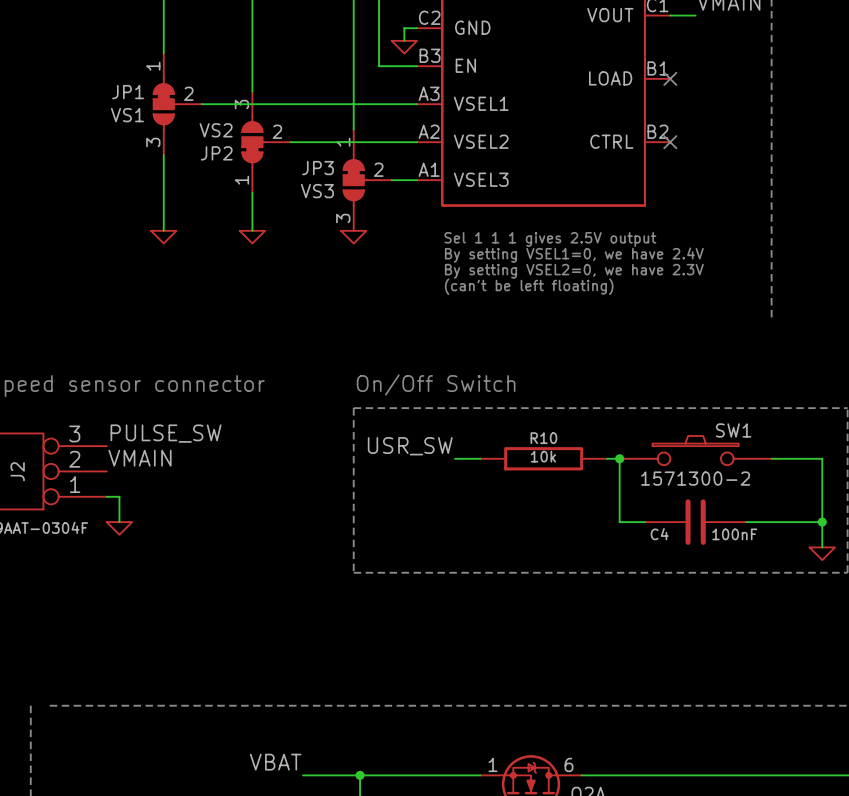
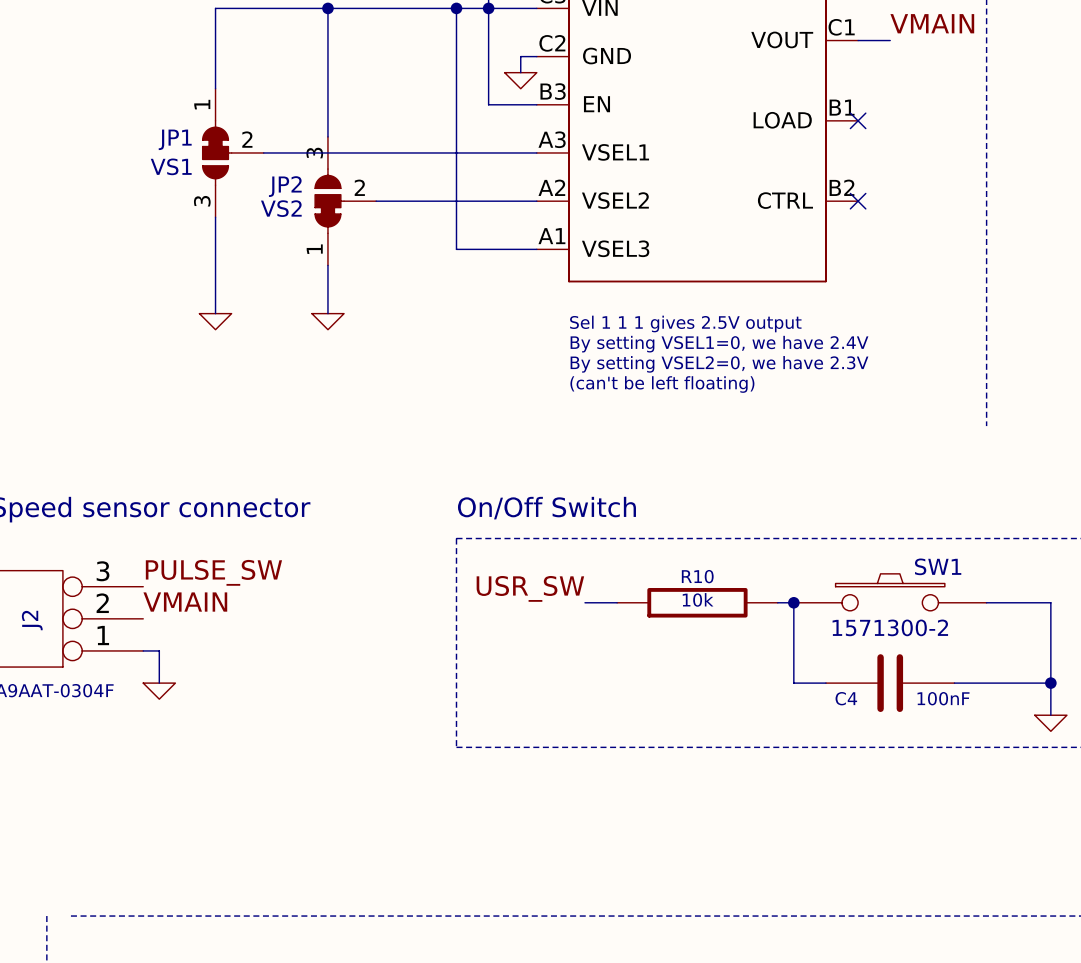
JP2 value position: VS2 (216, 130) -> VS2 (281, 208)
JP2 name position: JP2 (216, 153) -> JP2 (285, 186)
JP3: VS3 (367, 180) -> none
power symbol: (353, 237) -> none

